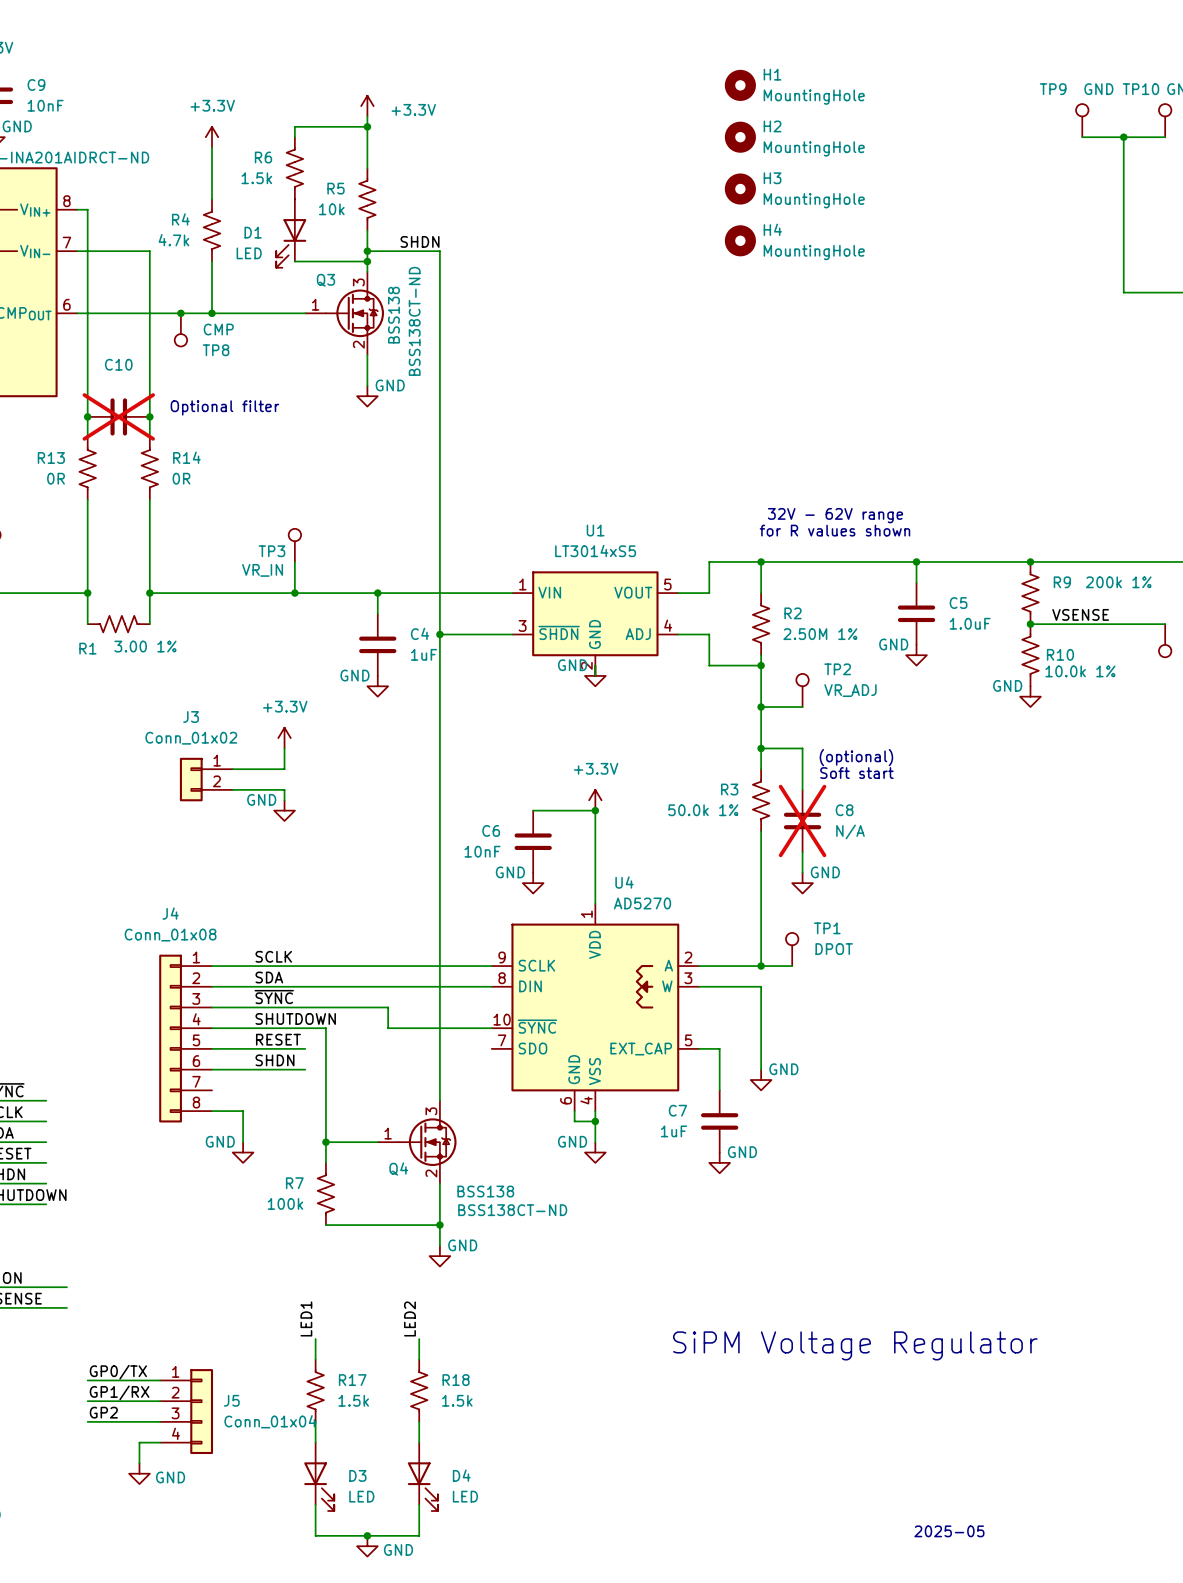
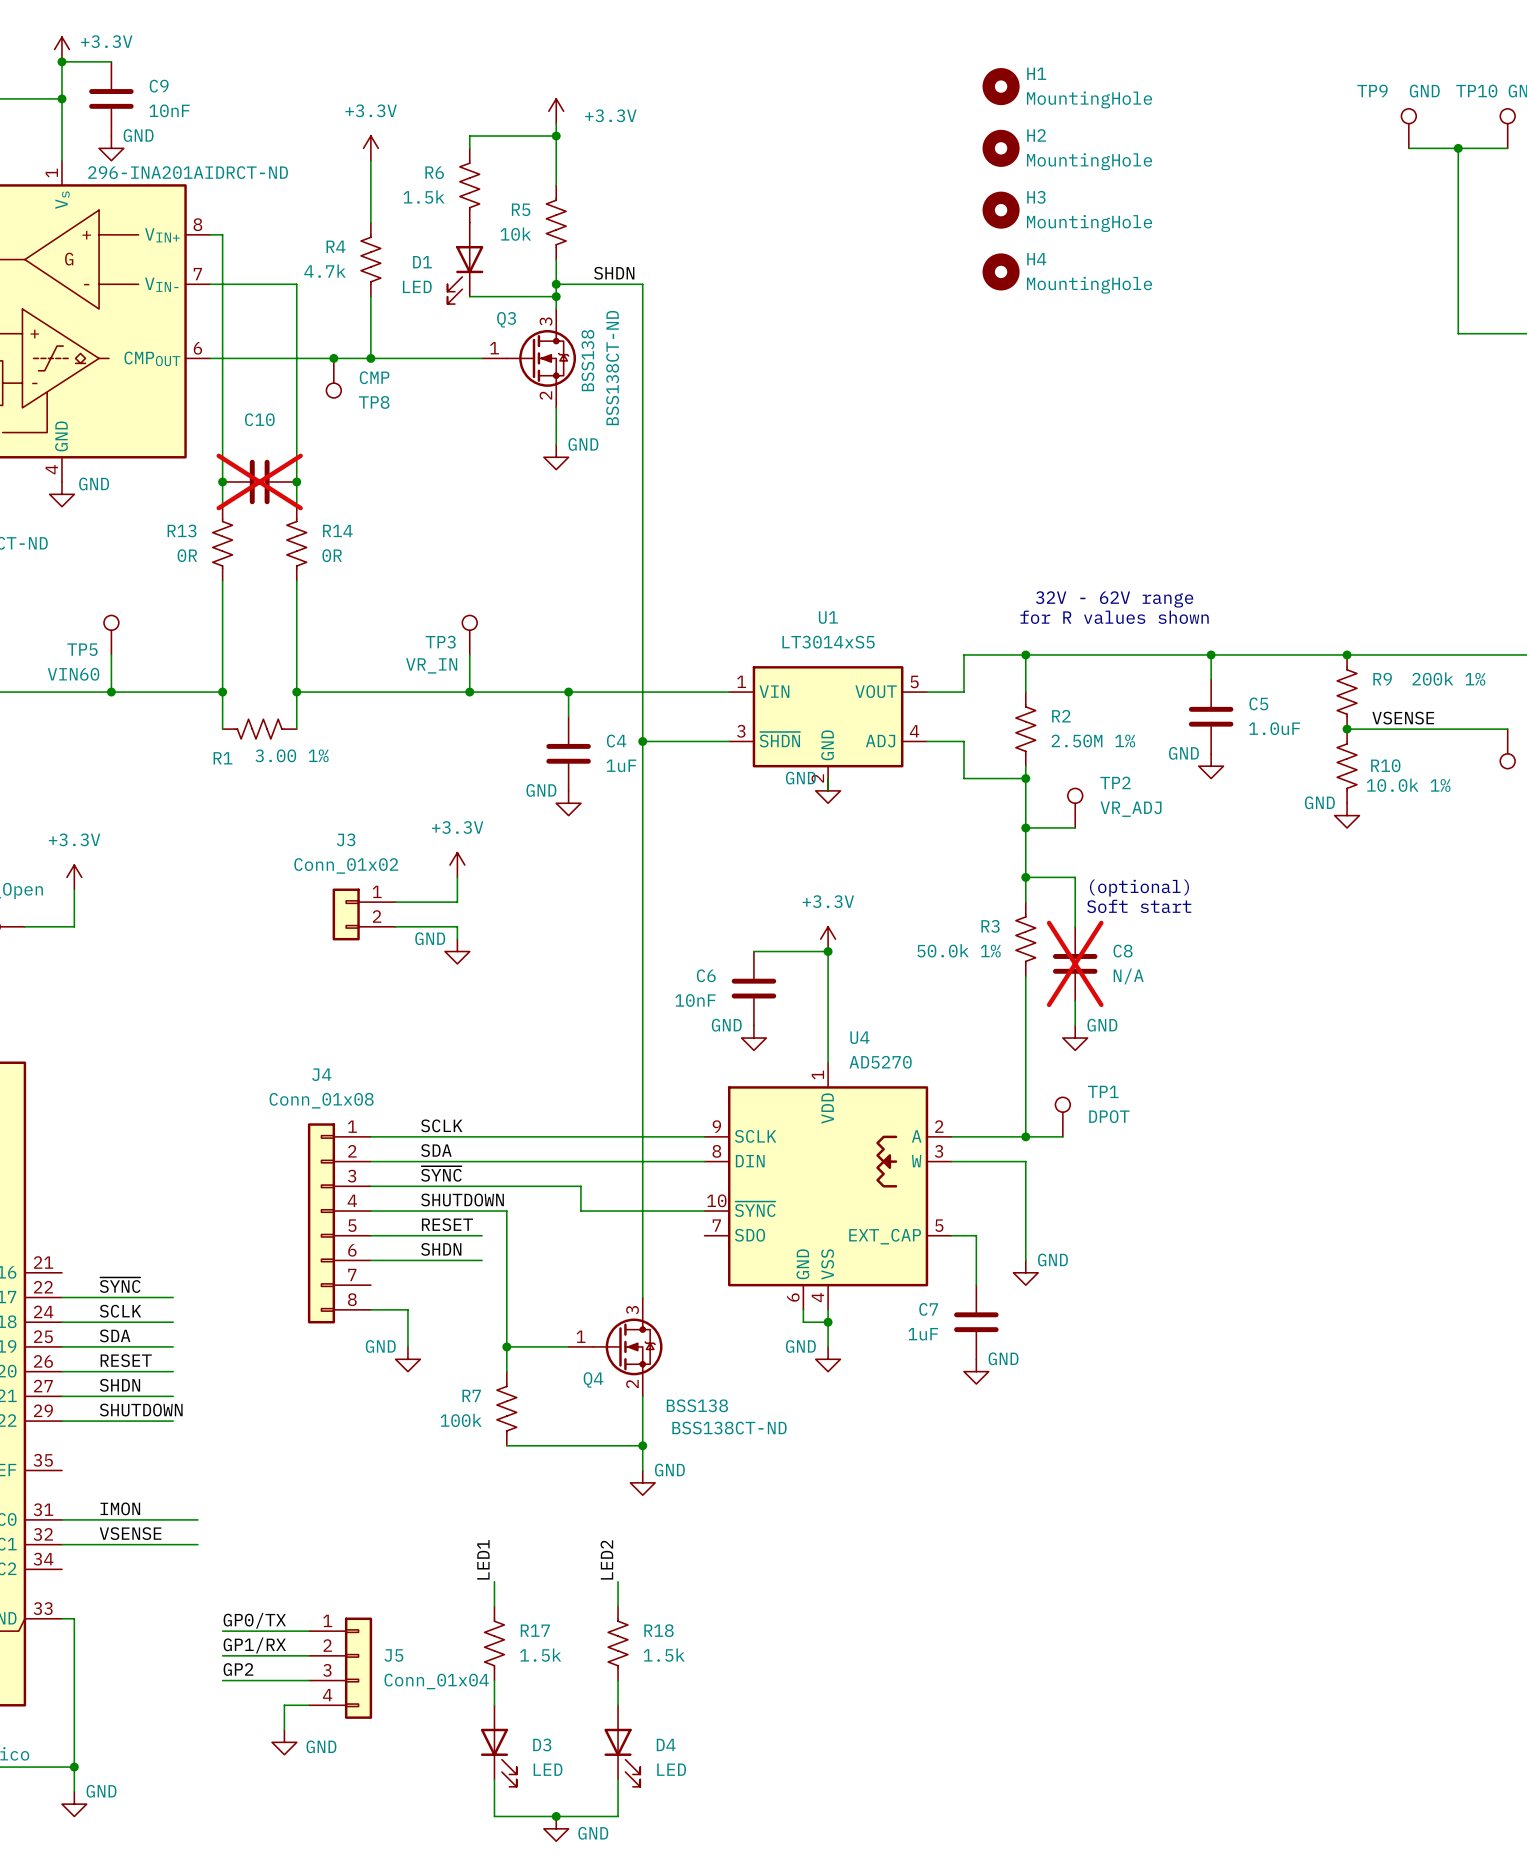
text: Optional filter (224, 407) -> none
text: SiPM Voltage Regulator (855, 1345) -> none
text: 2025-05 (949, 1531) -> none

